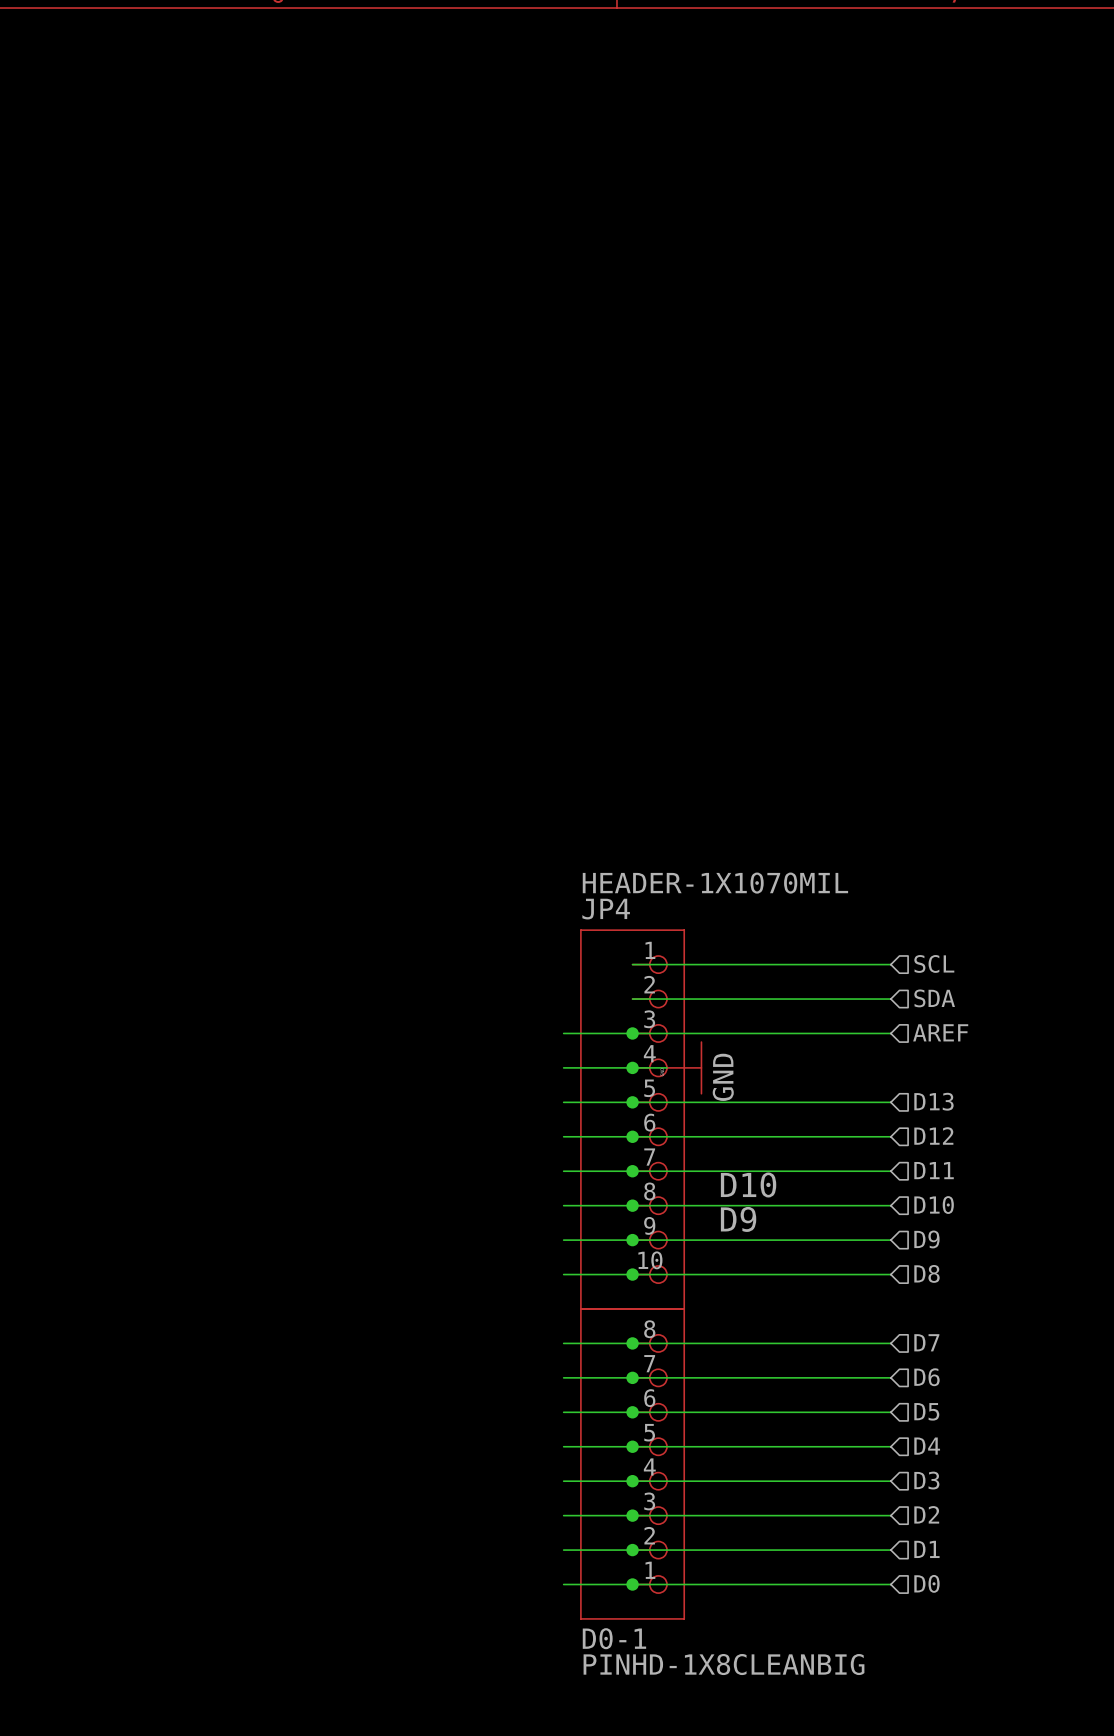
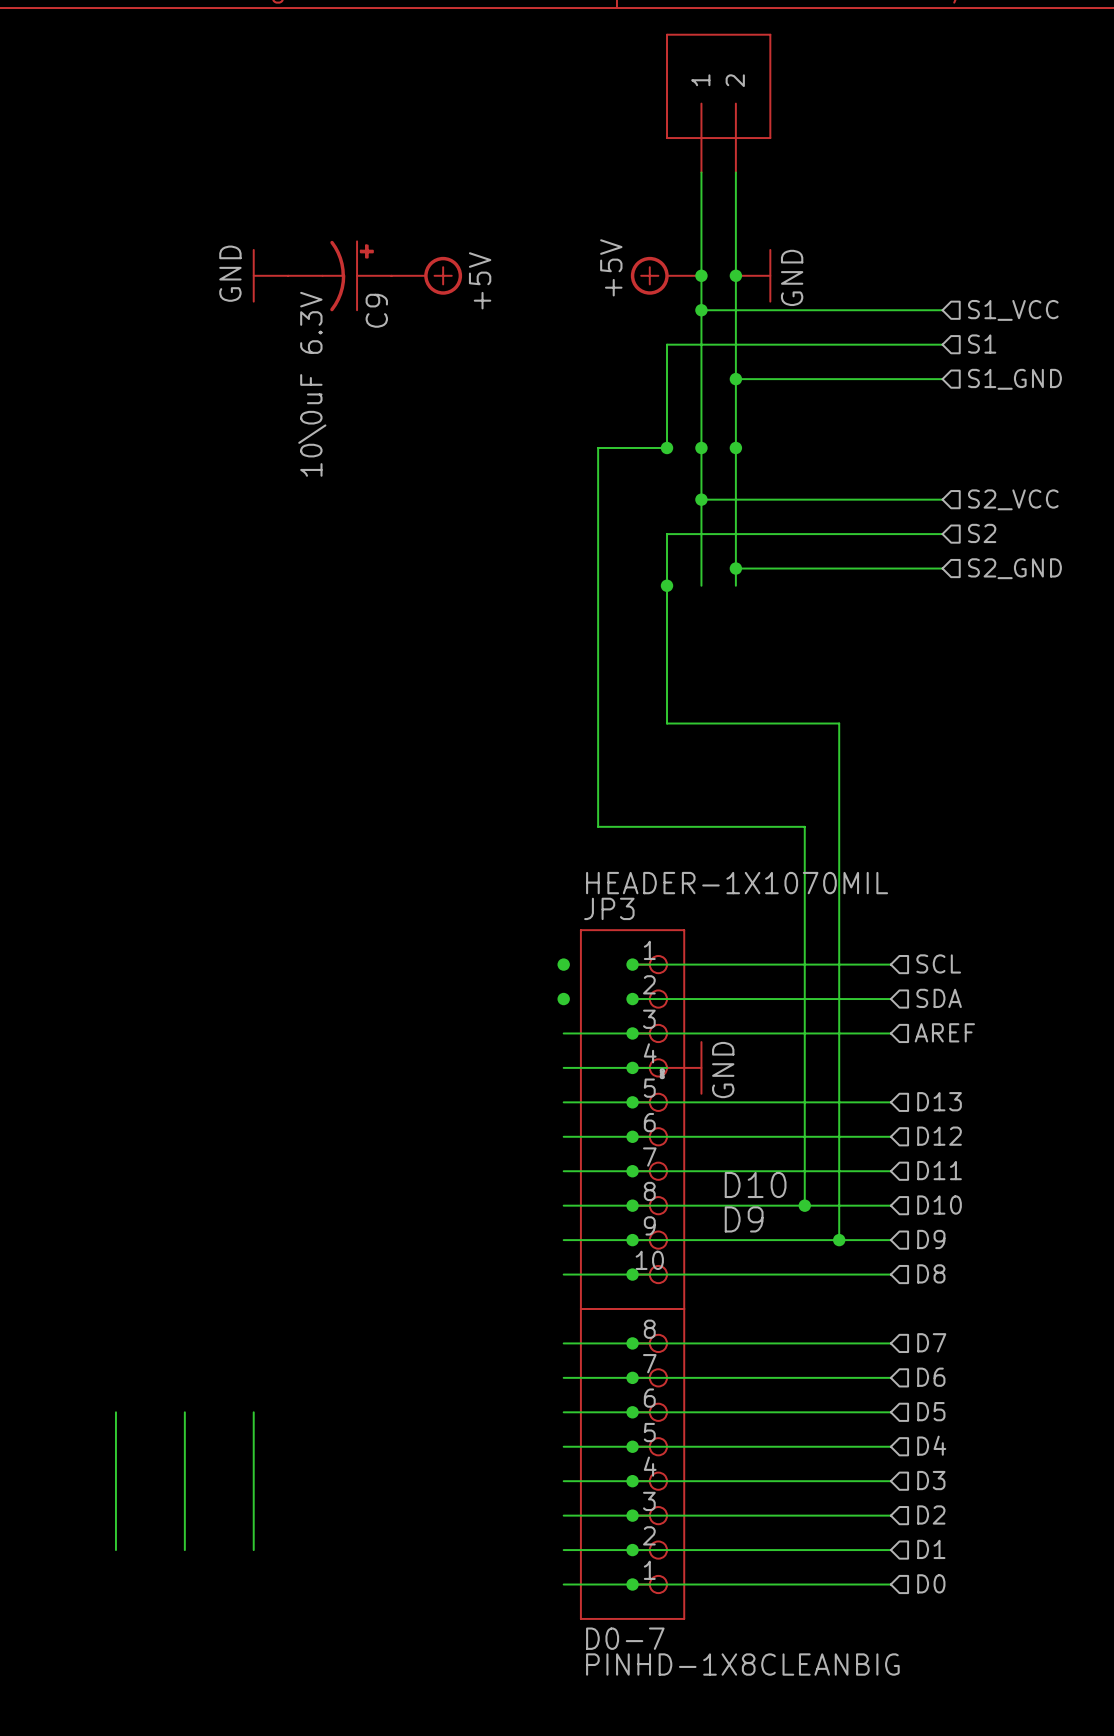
part: none -> (718, 103)
wire: none -> (701, 172) (701, 585)
wire: none -> (735, 172) (735, 585)
power symbol: none -> GND (270, 275)
power symbol: none -> +5V (426, 275)
power symbol: none -> +5V (666, 275)
junction: none -> (701, 275)
junction: none -> (735, 275)
power symbol: none -> GND (753, 275)
C9: none -> 10\0uF 6.3V (339, 276)
wire: none -> (701, 310) (942, 310)
junction: none -> (701, 310)
hierarchical label: none -> S1_VCC (1013, 310)
wire: none -> (942, 344) (667, 344) (667, 447) (598, 447) (598, 826) (804, 826) (804, 1205)
hierarchical label: none -> S1 (982, 344)
wire: none -> (735, 379) (942, 379)
junction: none -> (735, 379)
hierarchical label: none -> S1_GND (1014, 379)
junction: none -> (667, 447)
junction: none -> (701, 447)
junction: none -> (735, 447)
wire: none -> (701, 499) (942, 499)
junction: none -> (701, 499)
hierarchical label: none -> S2_VCC (1013, 499)
hierarchical label: none -> S2 (982, 533)
wire: none -> (942, 534) (667, 534) (667, 723) (839, 723) (839, 1240)
wire: none -> (735, 568) (942, 568)
junction: none -> (735, 568)
hierarchical label: none -> S2_GND (1014, 568)
junction: none -> (667, 585)
JP4 name: JP4 (606, 909) -> JP3 (609, 908)
junction: none -> (563, 964)
junction: none -> (632, 964)
junction: none -> (563, 999)
junction: none -> (632, 999)
junction: none -> (804, 1205)
junction: none -> (839, 1240)
wire: none -> (115, 1412) (115, 1550)
wire: none -> (184, 1412) (184, 1550)
wire: none -> (253, 1412) (253, 1550)
D0-1 name: D0-1 (614, 1638) -> D0-7 (625, 1638)

